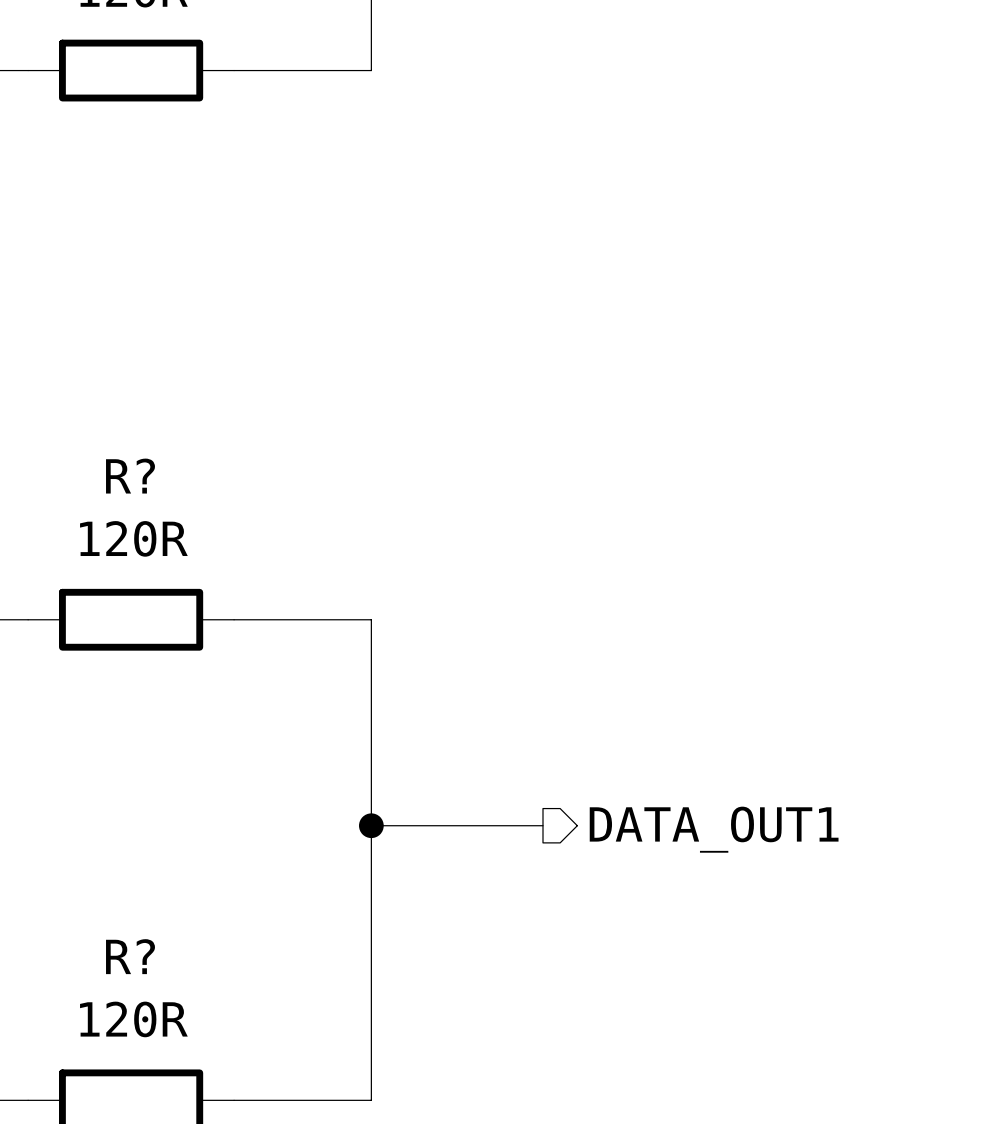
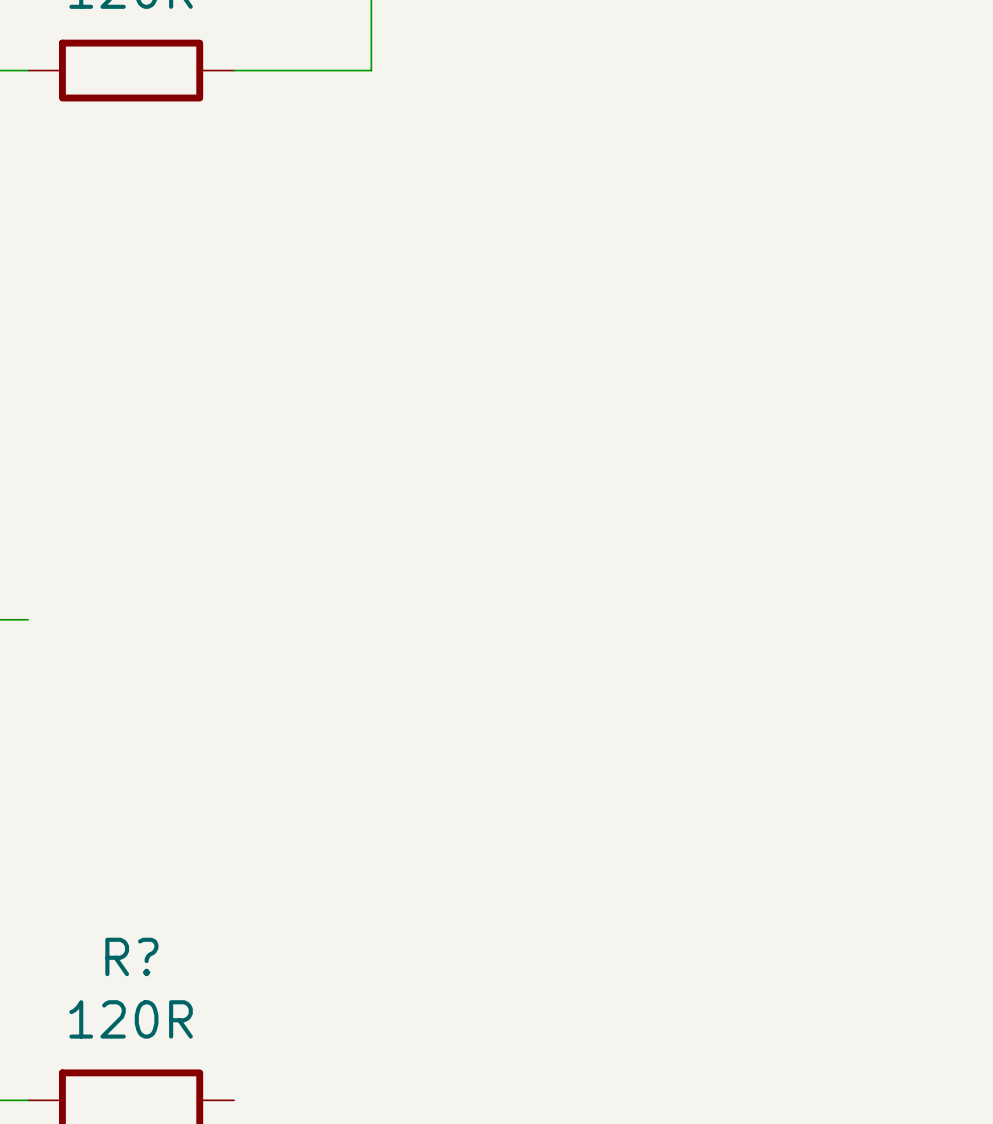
R?: 120R (131, 619) -> none
wire: (234, 619) (371, 619) (371, 1100) (234, 1100) -> none
wire: (371, 825) (542, 825) -> none
junction: (371, 825) -> none
hierarchical label: DATA_OUT1 (714, 829) -> none

